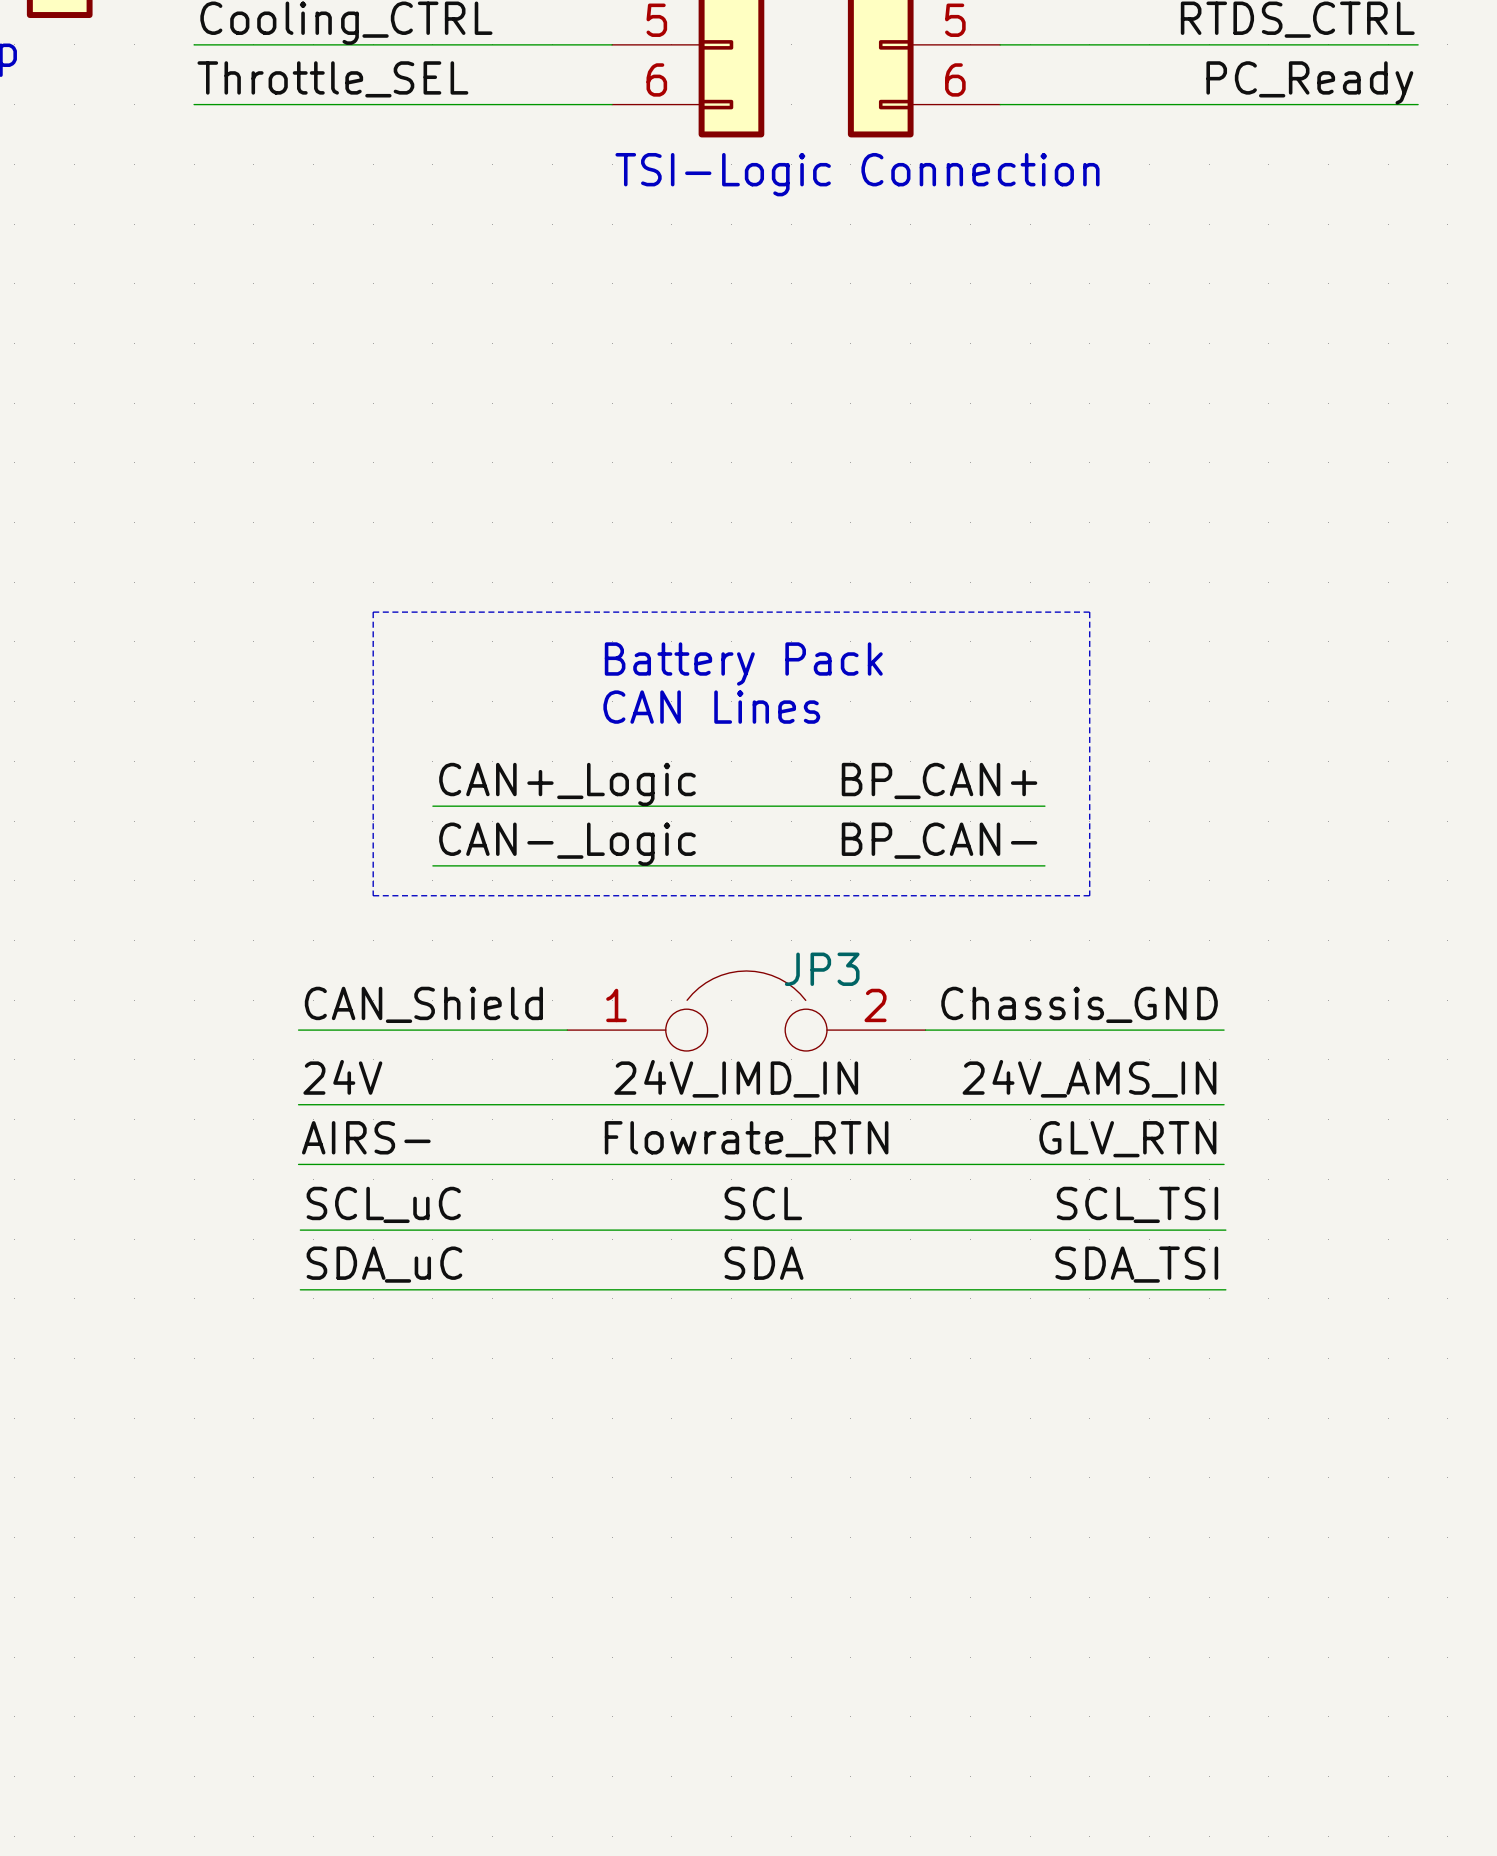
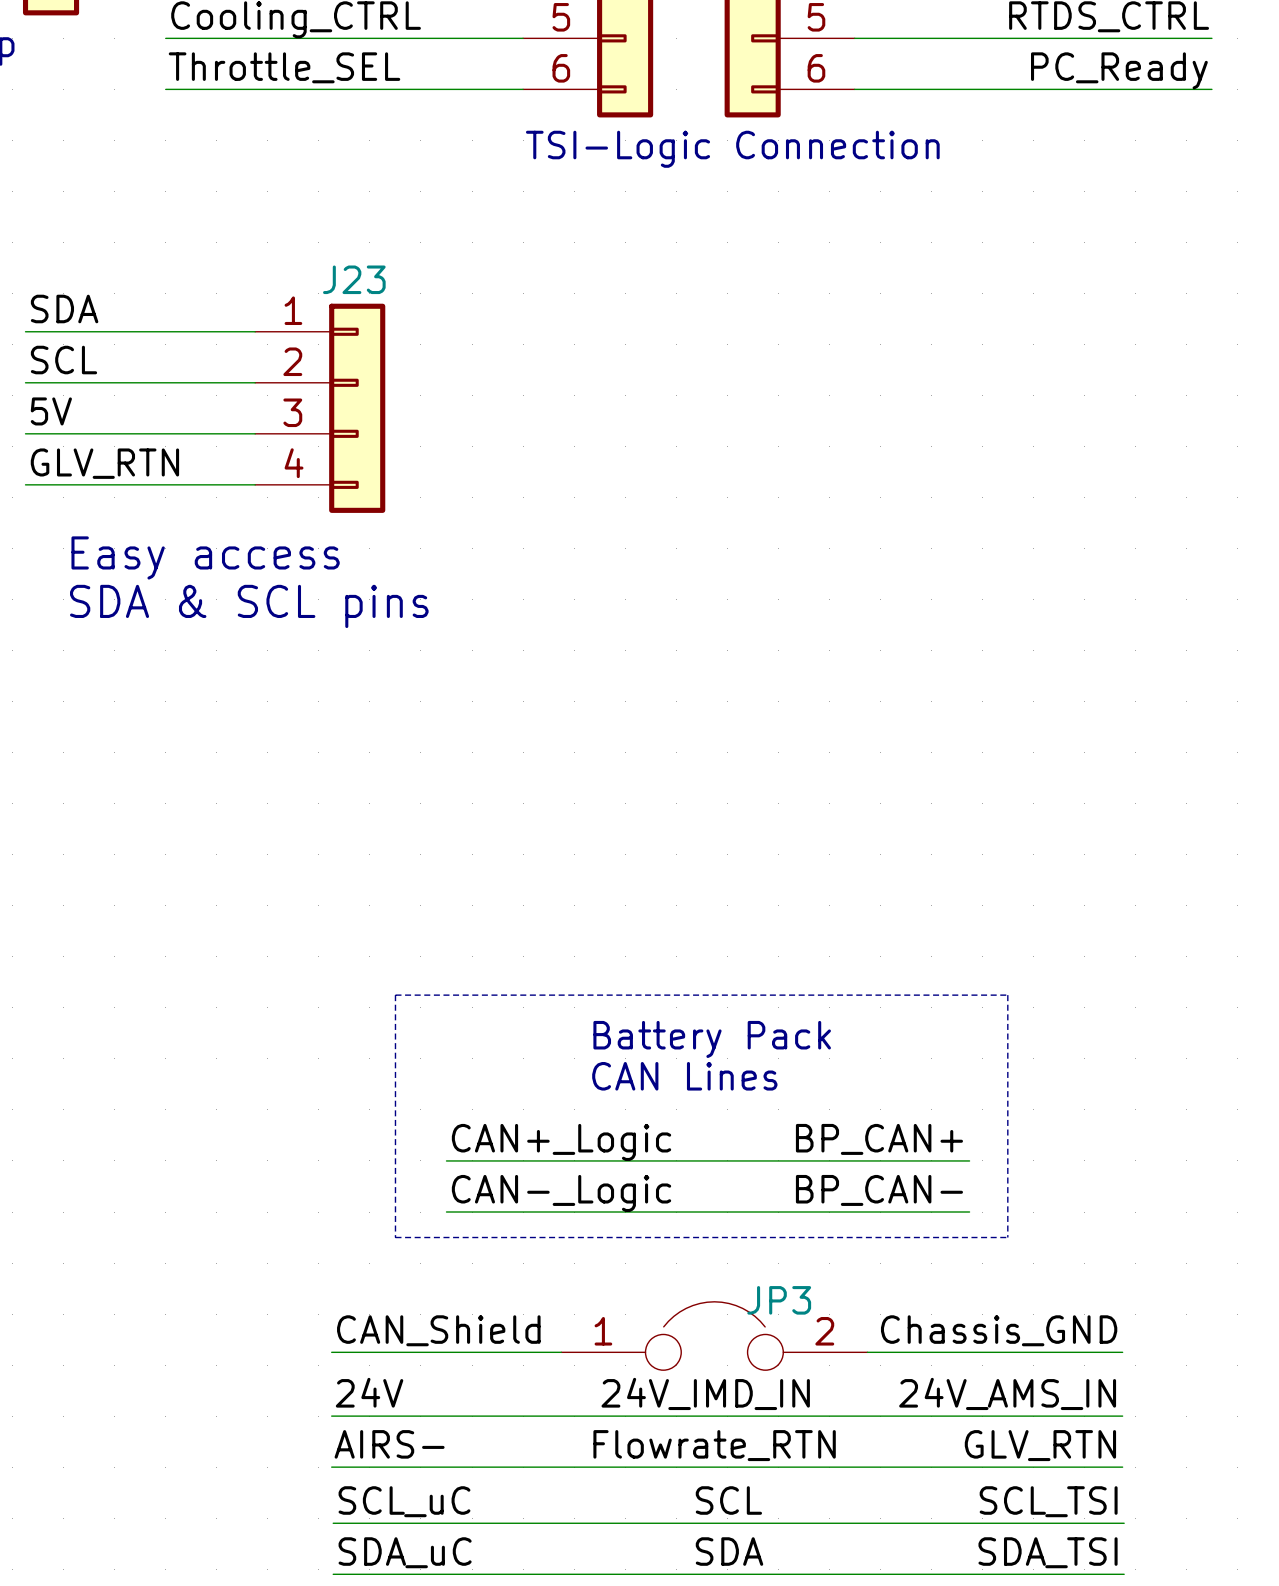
label: none -> SDA (64, 308)
wire: none -> (25, 331) (255, 331)
label: none -> SCL (63, 360)
wire: none -> (25, 382) (255, 382)
J23: none -> (320, 408)
label: none -> 5V (51, 411)
wire: none -> (25, 433) (255, 433)
label: none -> GLV_RTN (104, 463)
wire: none -> (25, 484) (255, 484)
line: (373, 612) (373, 895) (1089, 895) (1089, 612) (373, 612) -> (395, 995) (395, 1237) (1007, 1237) (1007, 995) (395, 995)
text: none -> Easy access (205, 557)
text position: Battery Pack (743, 663) -> Battery Pack (712, 1039)
text position: CAN Lines (711, 707) -> CAN Lines (684, 1076)
text: none -> SDA & SCL pins (249, 606)
label position: BP_CAN+ (939, 780) -> BP_CAN+ (879, 1139)
label position: CAN+_Logic (567, 784) -> CAN+_Logic (561, 1142)
wire: (432, 806) (1044, 806) -> (446, 1160) (969, 1160)
label position: BP_CAN- (939, 840) -> BP_CAN- (879, 1190)
label position: CAN-_Logic (567, 844) -> CAN-_Logic (561, 1193)
wire: (432, 865) (1044, 865) -> (446, 1212) (969, 1212)
label position: CAN_Shield (423, 1004) -> CAN_Shield (438, 1330)
label position: Chassis_GND (1079, 1004) -> Chassis_GND (999, 1330)
JP3 position: (746, 1010) -> (714, 1335)
wire: (298, 1030) (567, 1030) -> (331, 1352) (561, 1352)
wire: (925, 1030) (1224, 1030) -> (867, 1352) (1122, 1352)
label position: 24V (342, 1077) -> 24V (369, 1392)
label position: 24V_IMD_IN (736, 1078) -> 24V_IMD_IN (705, 1393)
label position: 24V_AMS_IN (1089, 1078) -> 24V_AMS_IN (1007, 1393)
wire: (298, 1104) (1224, 1104) -> (331, 1416) (1122, 1416)
label position: AIRS- (366, 1137) -> AIRS- (389, 1444)
label position: Flowrate_RTN (746, 1139) -> Flowrate_RTN (714, 1445)
label position: GLV_RTN (1127, 1139) -> GLV_RTN (1040, 1445)
wire: (298, 1164) (1224, 1164) -> (331, 1467) (1122, 1467)
label: SCL (763, 1203) -> none
label position: SCL_uC (383, 1204) -> SCL_uC (404, 1501)
label position: SCL_TSI (1137, 1204) -> SCL_TSI (1048, 1501)
wire: (300, 1230) (1225, 1230) -> (333, 1523) (1124, 1523)
label position: SDA (764, 1263) -> SDA (729, 1551)
label position: SDA_uC (384, 1264) -> SDA_uC (405, 1552)
label position: SDA_TSI (1136, 1264) -> SDA_TSI (1048, 1552)
wire: (300, 1289) (1225, 1289) -> (333, 1574) (1124, 1574)
label: none -> SCL (728, 1500)

